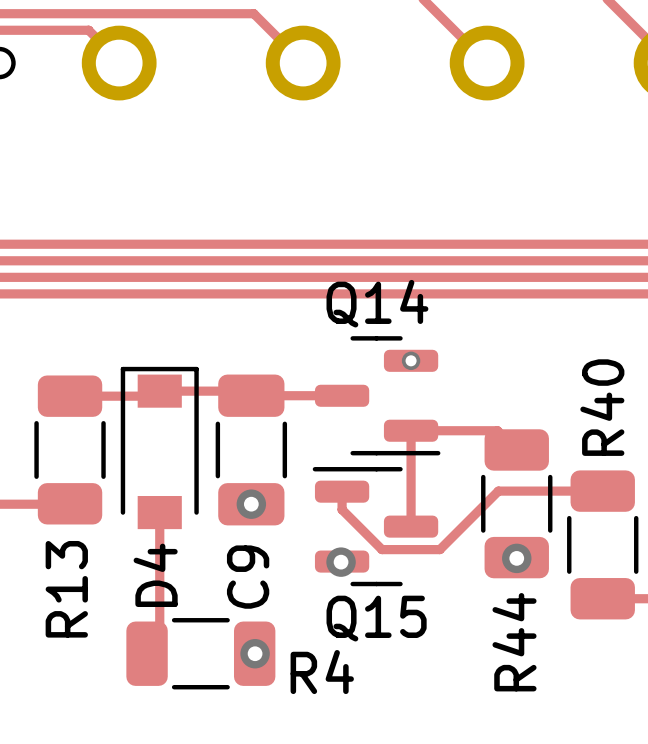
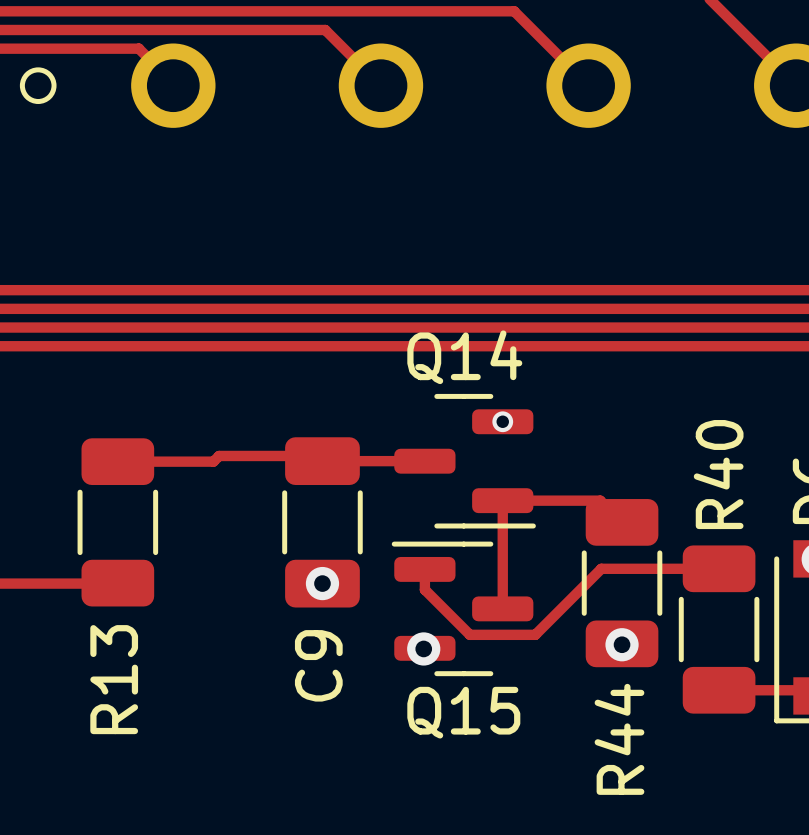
D4: (159, 447) -> none
track: (159, 512) (159, 641) (147, 653) -> none
R4: (200, 653) -> none
via: (255, 653) -> none

